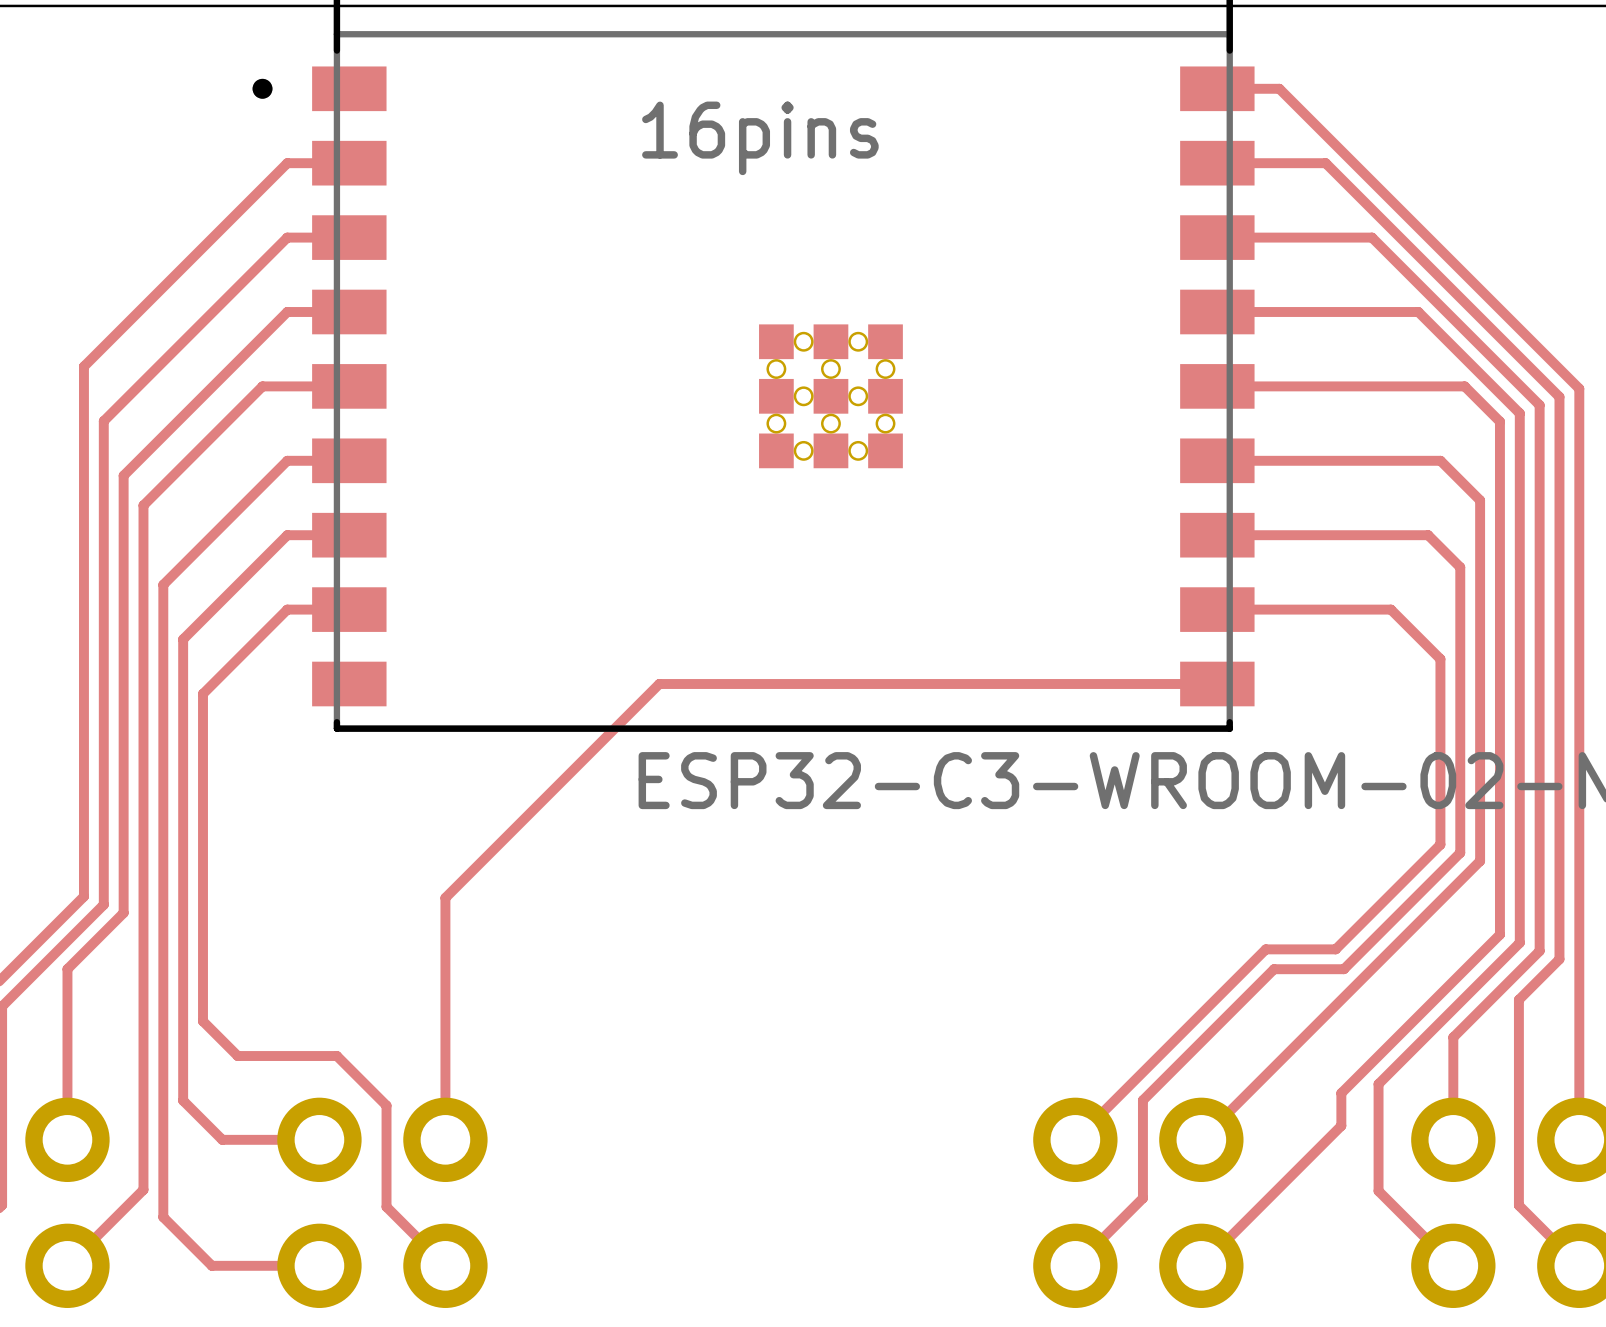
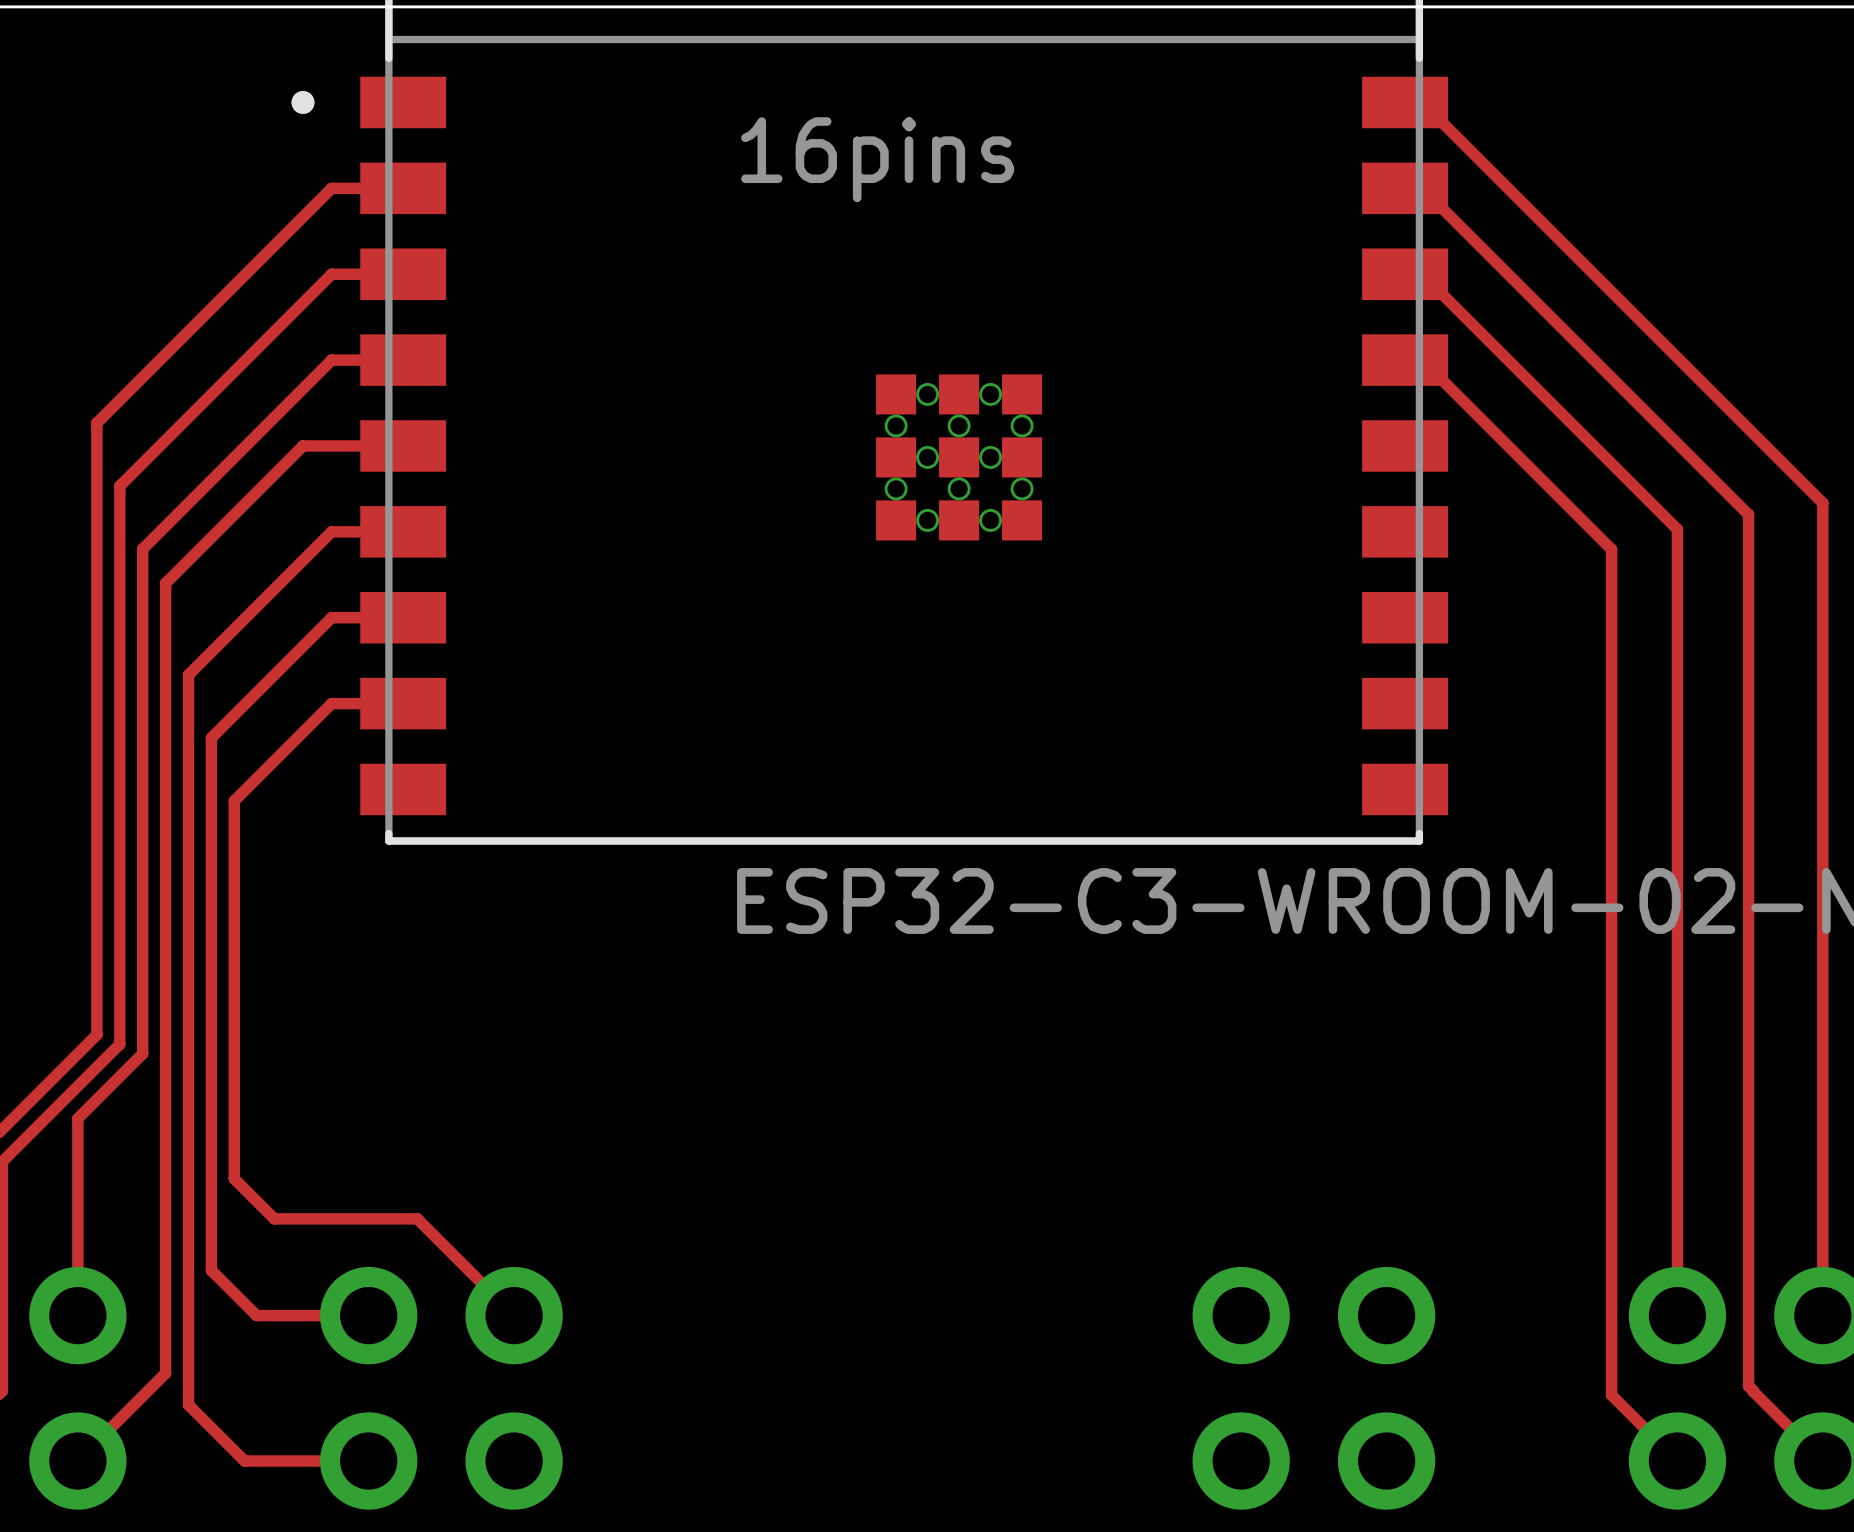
top track: (1232, 88) (1279, 88) (1579, 388) (1579, 435) -> (1422, 102) (1822, 503)
top track: (1232, 163) (1325, 163) (1559, 396) (1559, 959) (1518, 999) (1518, 1204) -> (1422, 188) (1748, 514) (1748, 1386) (1753, 1390)
top track: (1232, 237) (1372, 237) (1539, 405) (1539, 951) (1453, 1037) -> (1422, 274) (1677, 529) (1677, 1197)
top track: (1232, 311) (1418, 311) (1519, 413) (1519, 942) (1378, 1084) (1378, 1191) (1396, 1208) -> (1422, 360) (1611, 549) (1611, 1395)
top track: (1217, 386) (1464, 386) (1499, 421) (1499, 934) (1341, 1093) (1341, 1125) (1201, 1265) -> none
top track: (1217, 460) (1440, 460) (1480, 500) (1480, 861) (1201, 1139) -> none
top track: (1217, 535) (1428, 535) (1460, 567) (1460, 852) (1343, 969) (1274, 969) (1142, 1100) (1142, 1198) (1075, 1265) -> none
top track: (1217, 609) (1390, 609) (1440, 659) (1440, 844) (1335, 949) (1265, 949) (1075, 1139) -> none
top track: (1217, 684) (659, 684) (445, 897) (445, 1139) -> none
top track: (336, 1056) (386, 1105) (386, 1206) (445, 1265) -> (388, 1218) (417, 1218) (514, 1315)

